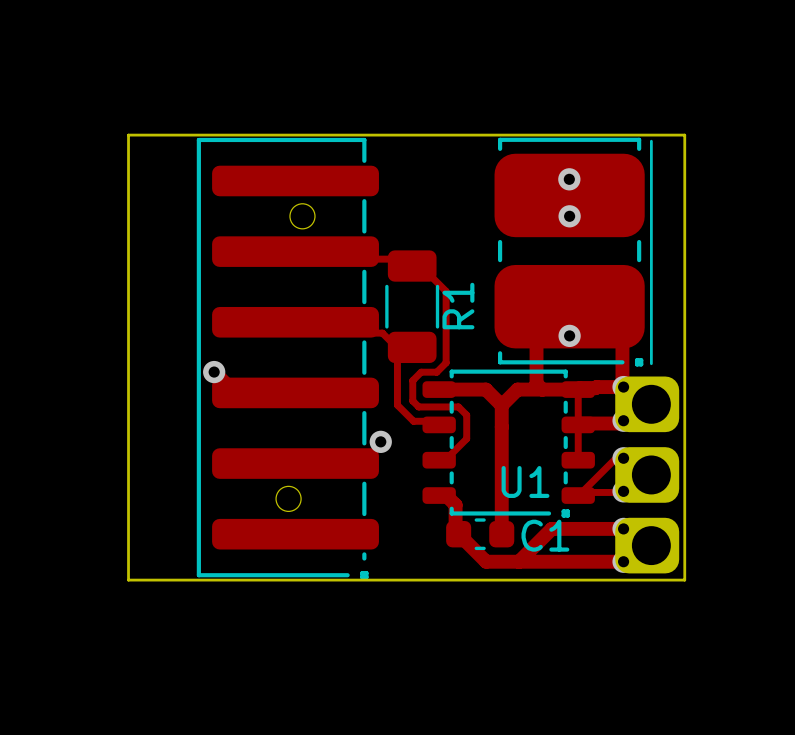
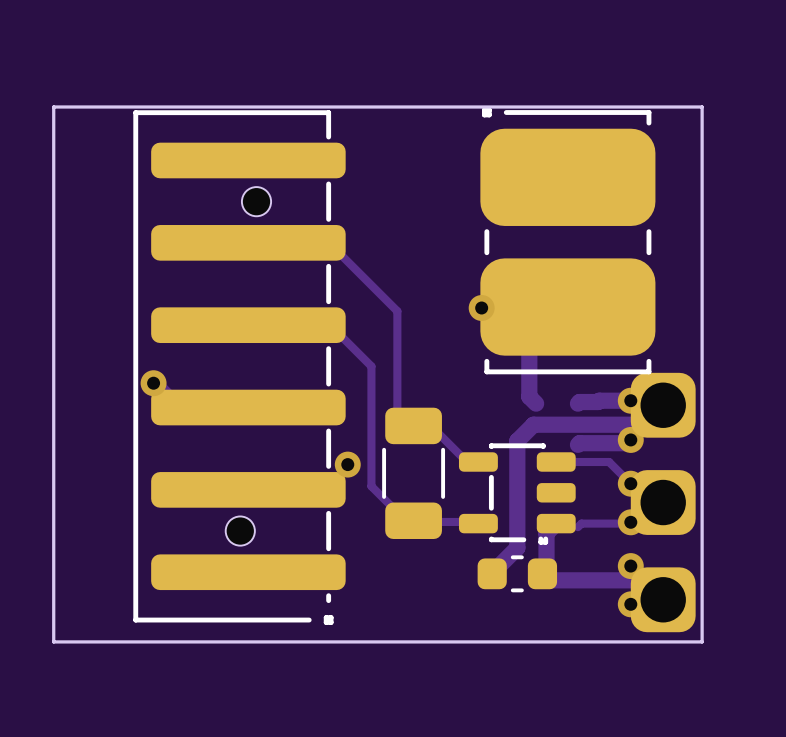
via: (569, 179) -> none
via: (569, 216) -> none
part rotation: 0° (569, 252) -> 180° (567, 240)
track: (372, 259) (405, 259) (412, 266) (420, 266) (446, 291) (446, 362) (436, 372) (421, 372) (412, 380) (412, 400) (418, 406) (458, 406) (466, 415) (466, 438) (445, 460) (439, 460) -> (337, 251) (397, 311) (397, 422) (400, 425) (431, 425) (467, 461) (478, 461)
R1: (412, 306) -> none
via: none -> (481, 308)
track: (361, 322) (372, 333) (382, 333) (397, 348) (397, 405) (413, 421) (435, 421) (439, 424) -> (325, 325) (330, 325) (371, 366) (371, 486) (405, 520) (476, 521) (478, 523)
via: (569, 335) -> none
track: (622, 339) (622, 384) -> none
part: (647, 356) -> none
track: (439, 389) (485, 389) (501, 405) -> none
track: (501, 405) (517, 389) (578, 389) (578, 460) -> none
track: (501, 405) (501, 536) -> none
track: none -> (630, 424) (533, 424) (517, 440) (517, 547) (492, 573)
track: none -> (556, 461) (609, 461) (630, 483)
U1: (508, 443) -> none
part: none -> (413, 473)
track: (616, 458) (578, 495) -> none
part: none -> (517, 494)
part: none -> (663, 502)
track: none -> (556, 523) (546, 533) (546, 570) (542, 573) (548, 580) (630, 580)
track: (439, 495) (446, 495) (455, 505) (455, 531) (486, 561) (622, 561) -> none
track: (622, 528) (551, 528) (519, 561) -> none
C1: (480, 534) -> none
part: none -> (517, 573)
board edge: (128, 580) (684, 580) -> (53, 625) (53, 641) (702, 641) (702, 625)

